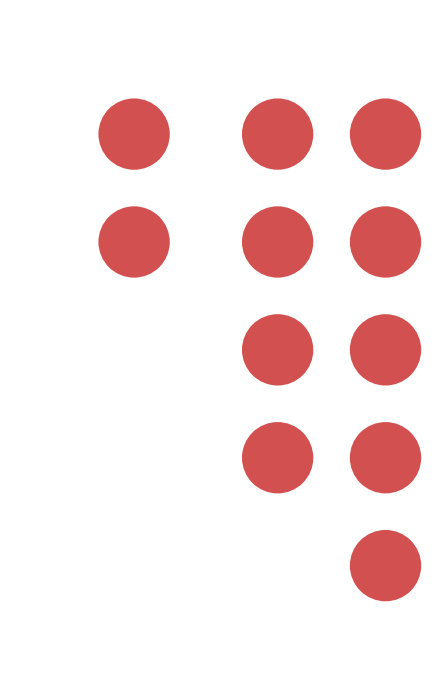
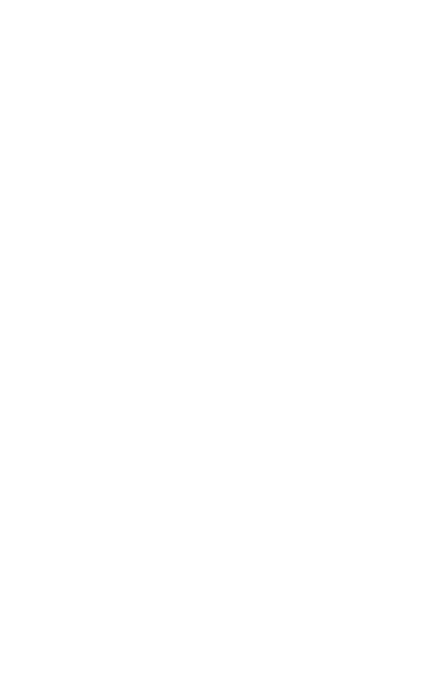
part: (134, 134) -> none
part: (277, 134) -> none
part: (385, 134) -> none
part: (134, 241) -> none
part: (277, 241) -> none
part: (385, 241) -> none
part: (277, 349) -> none
part: (385, 349) -> none
part: (277, 457) -> none
part: (385, 457) -> none
part: (385, 565) -> none

